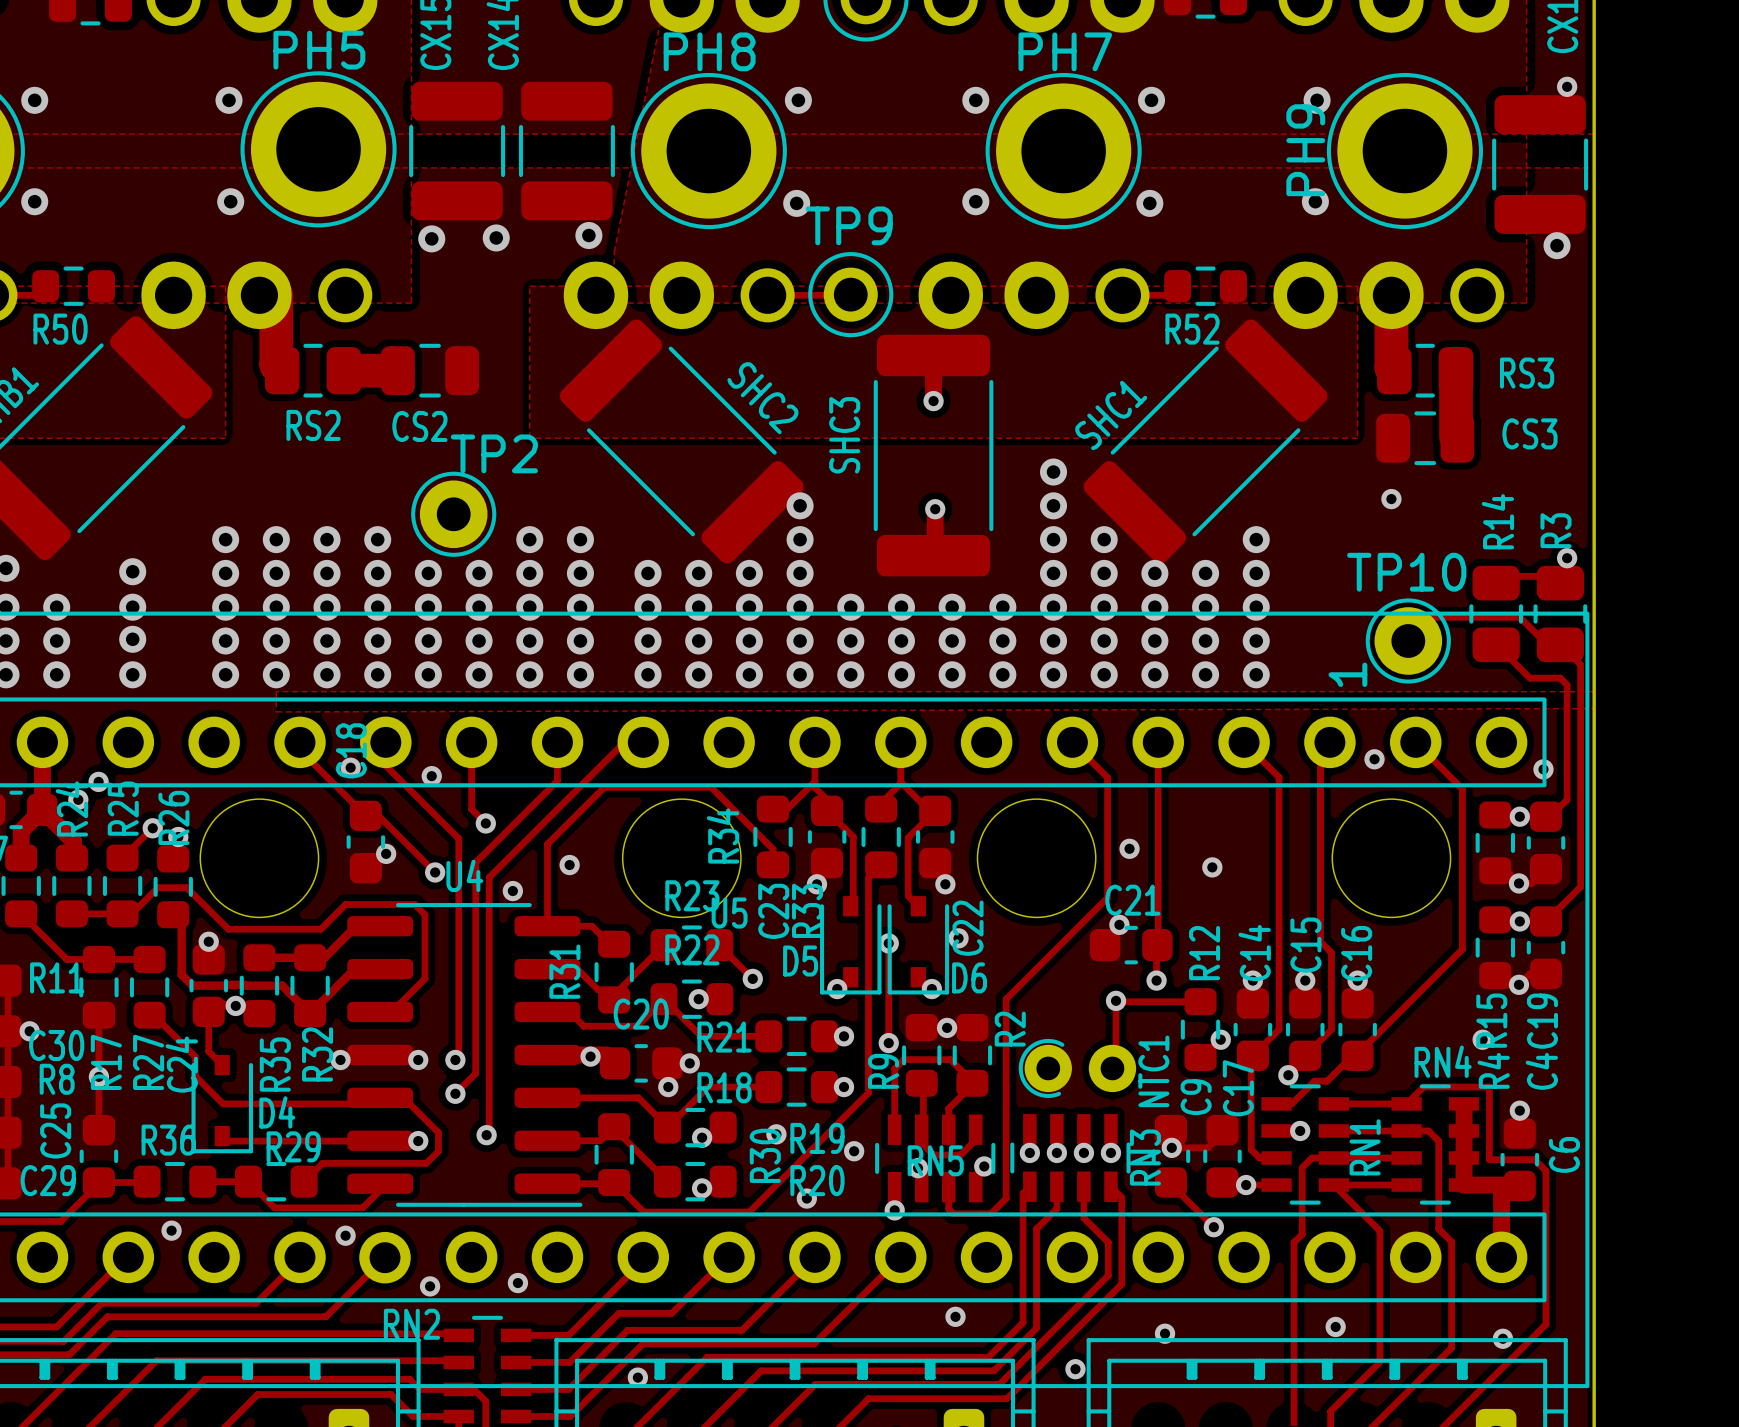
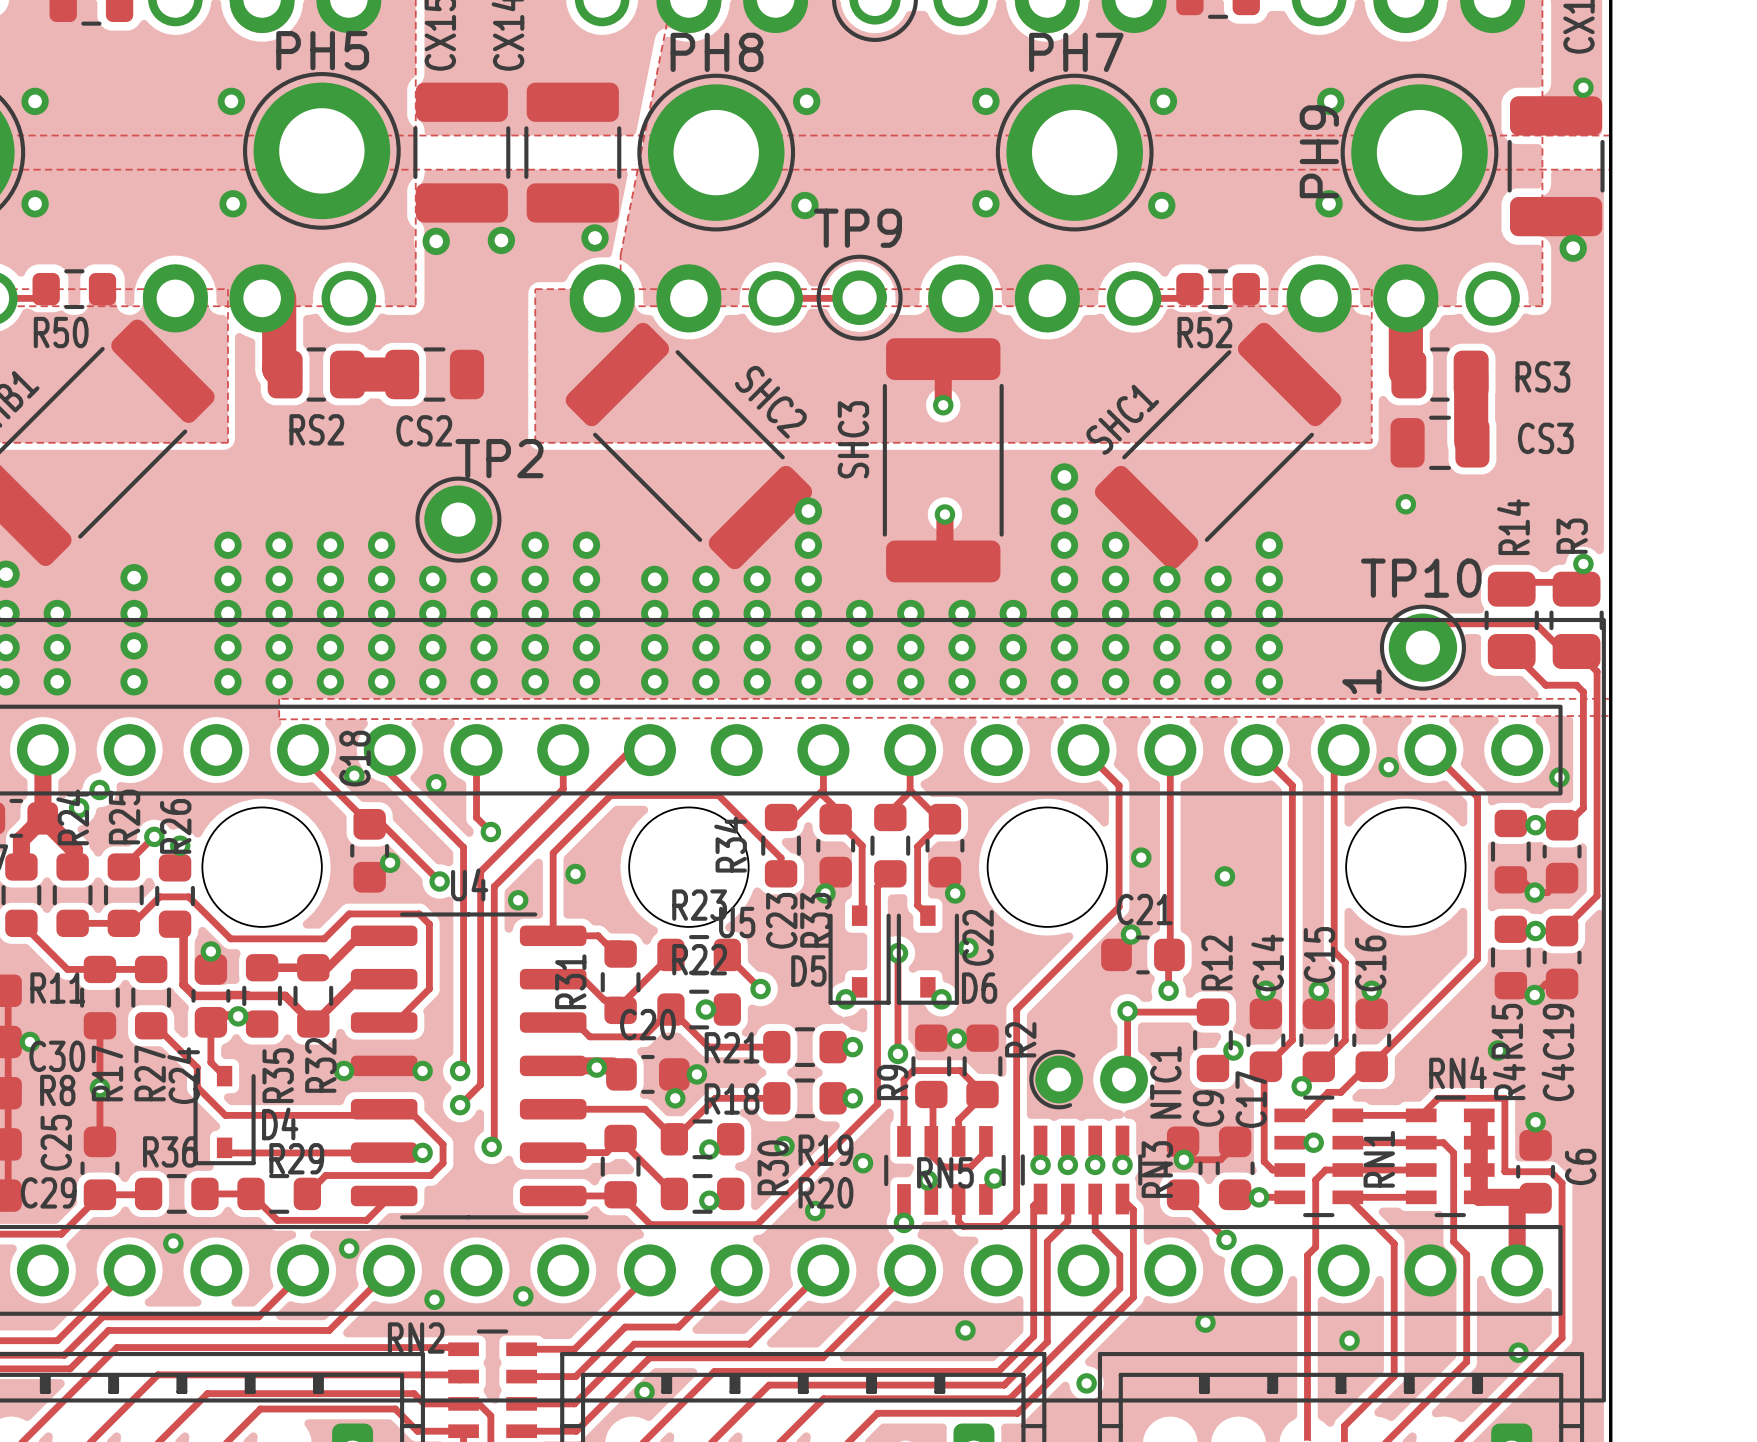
via position: (1165, 1333) -> (1205, 1322)

